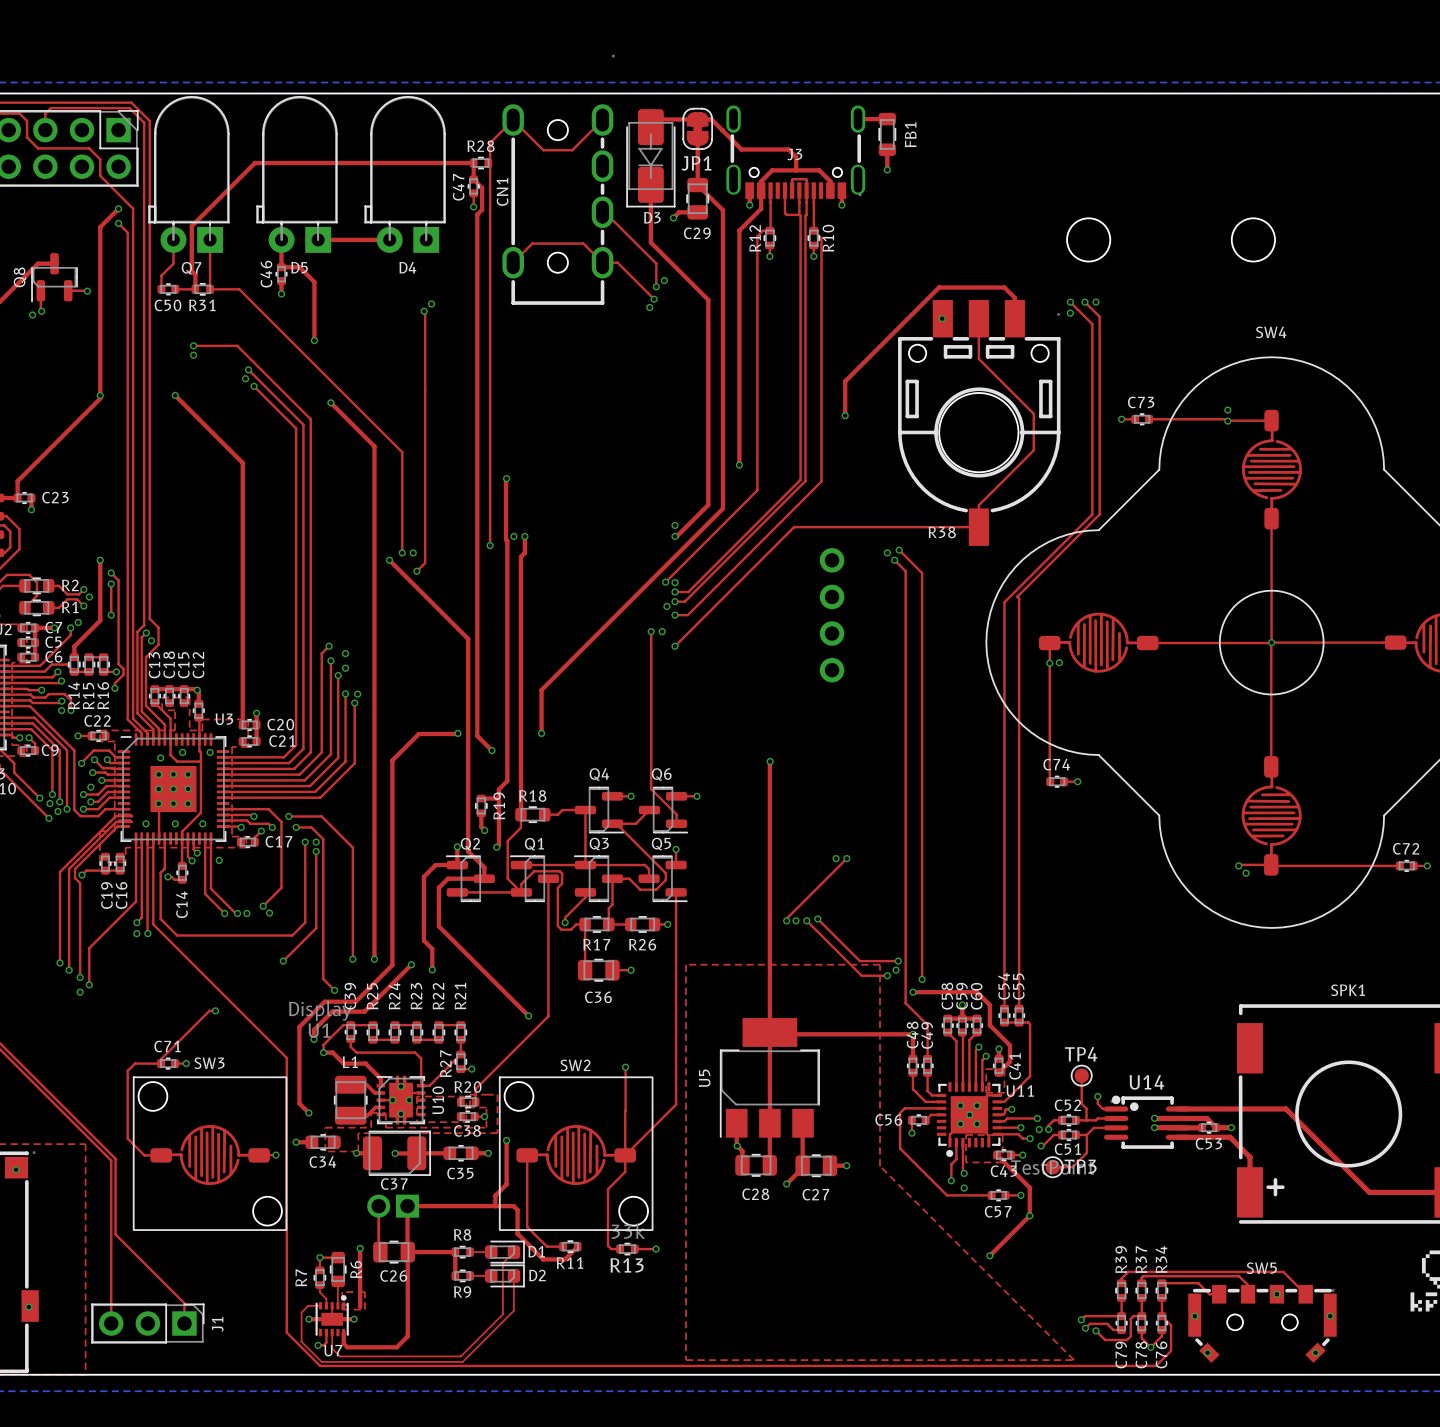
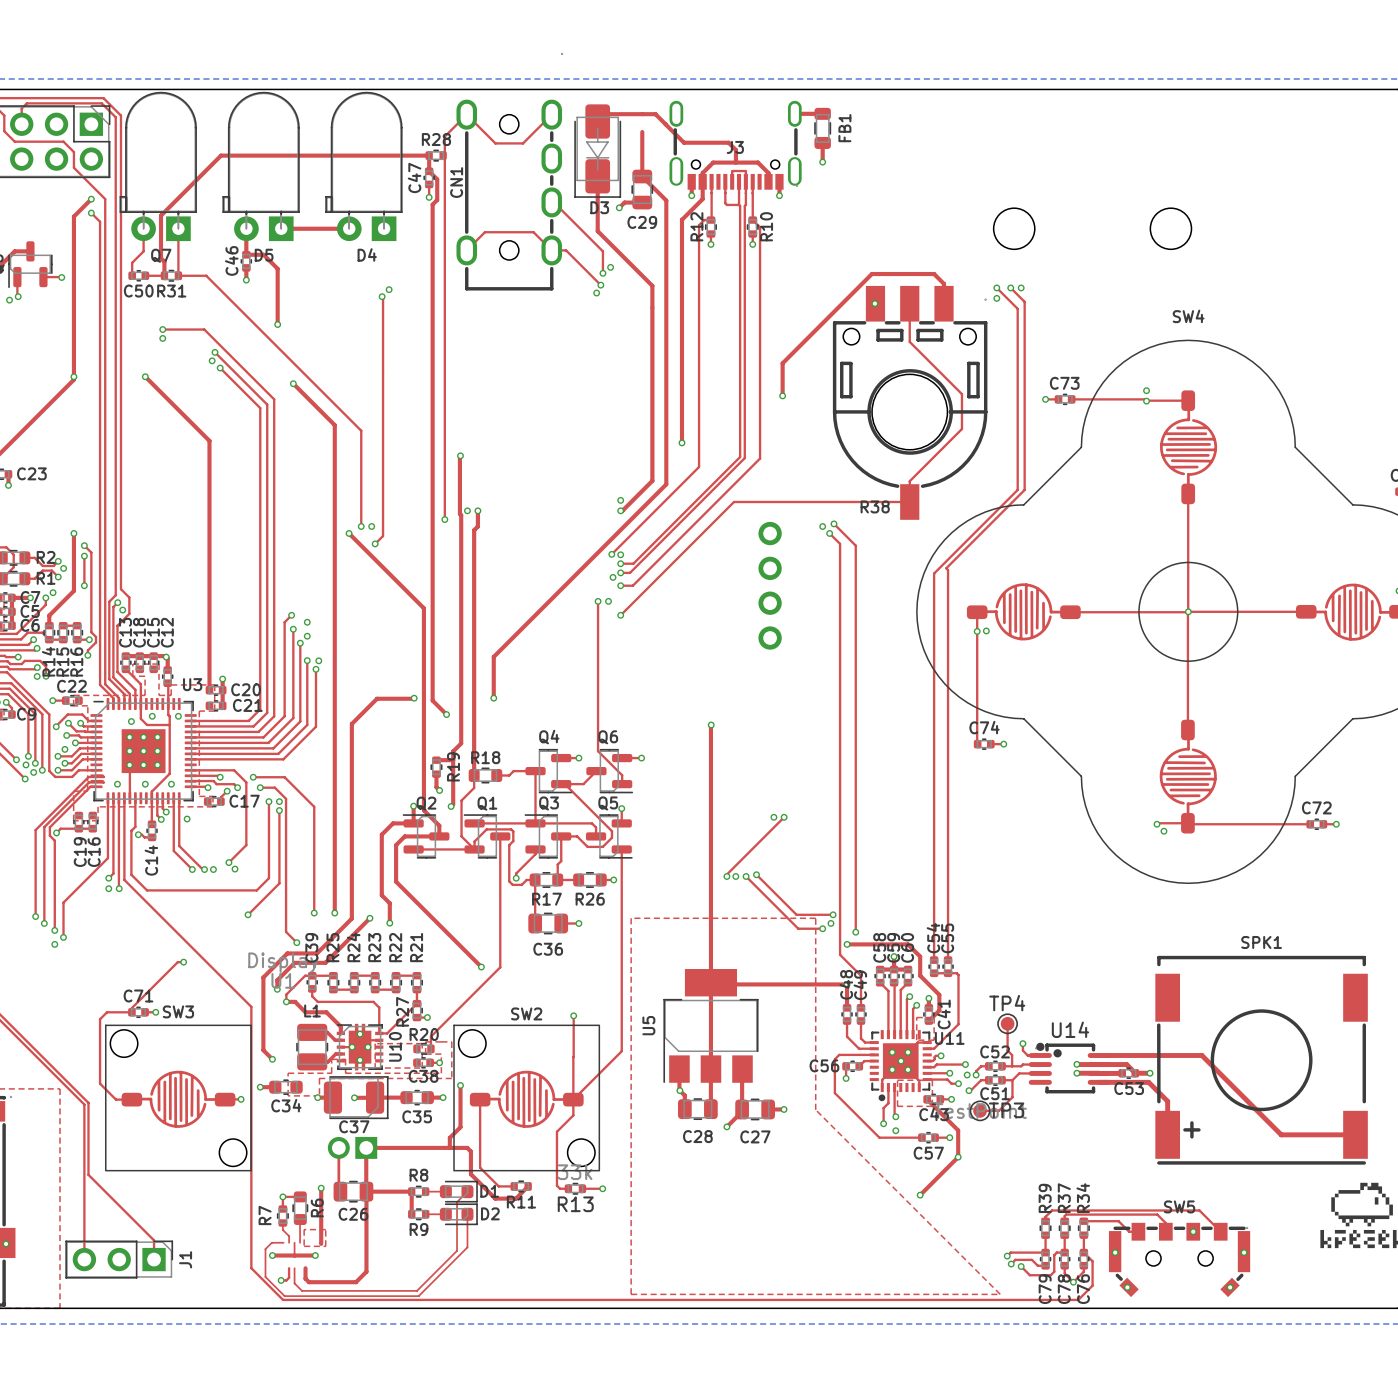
JP1: (697, 128) -> none
U7: (332, 1315) -> none

